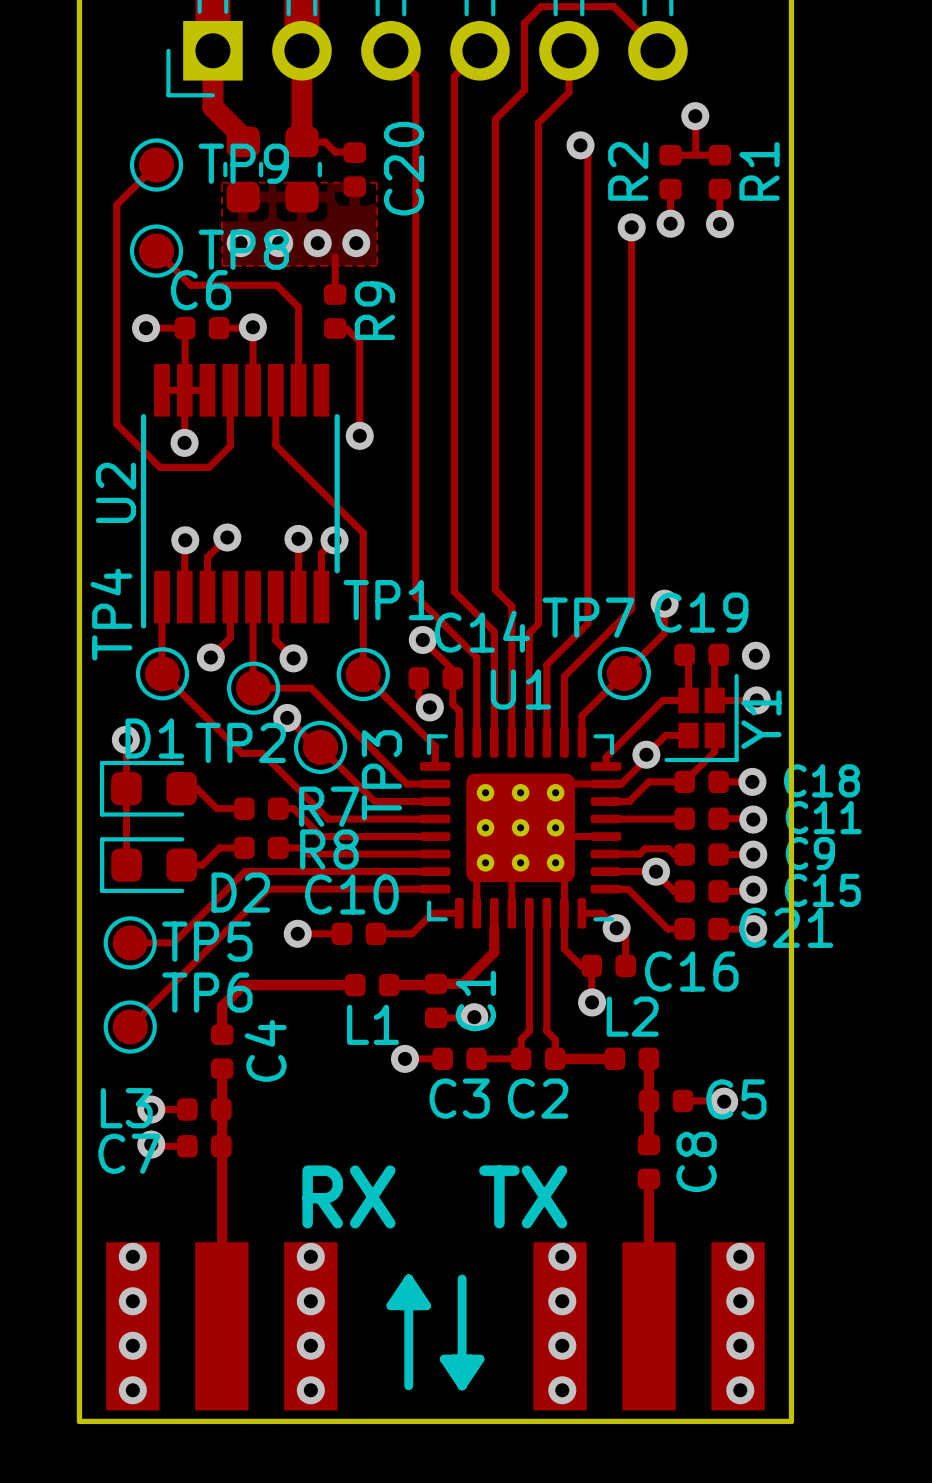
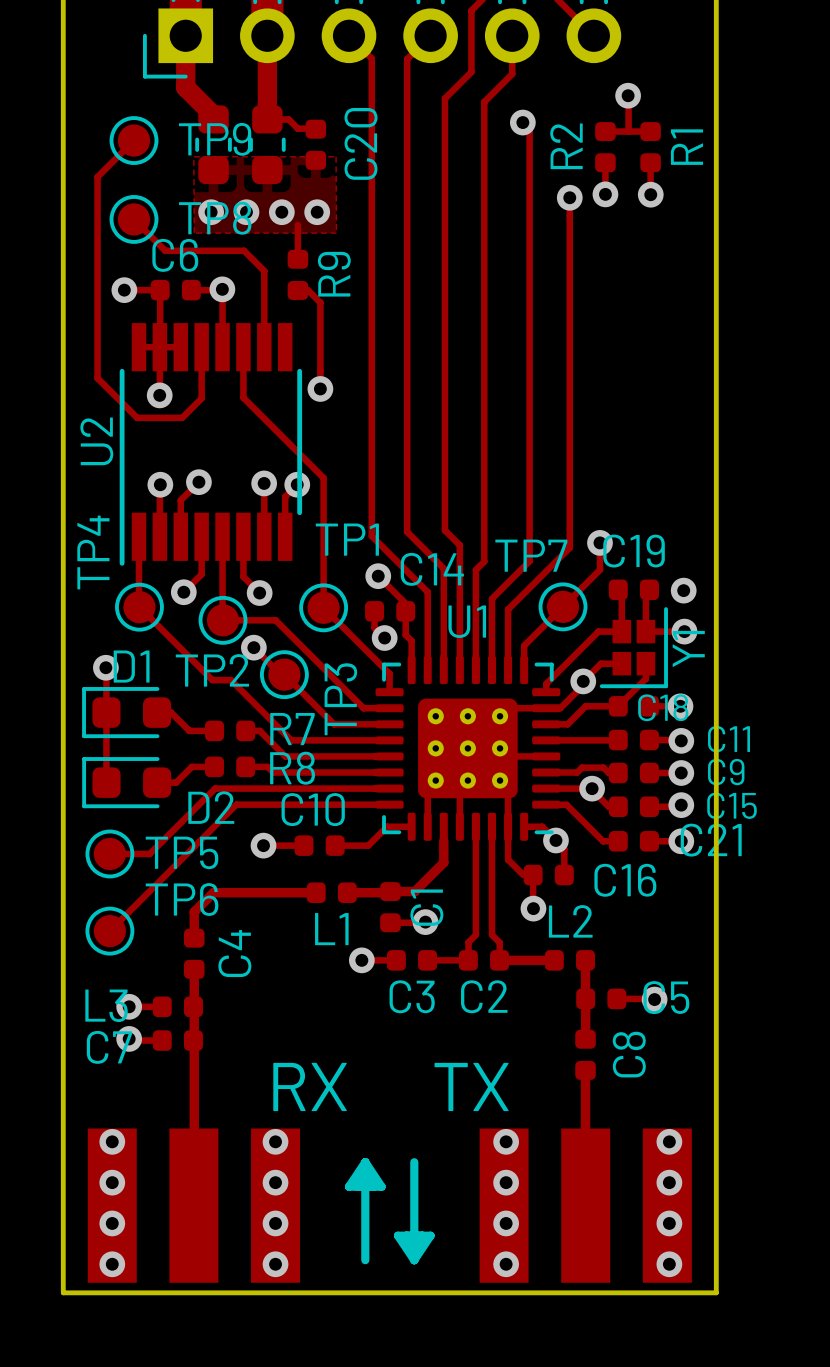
C18 name position: C18 (821, 780) -> C18 (663, 707)

